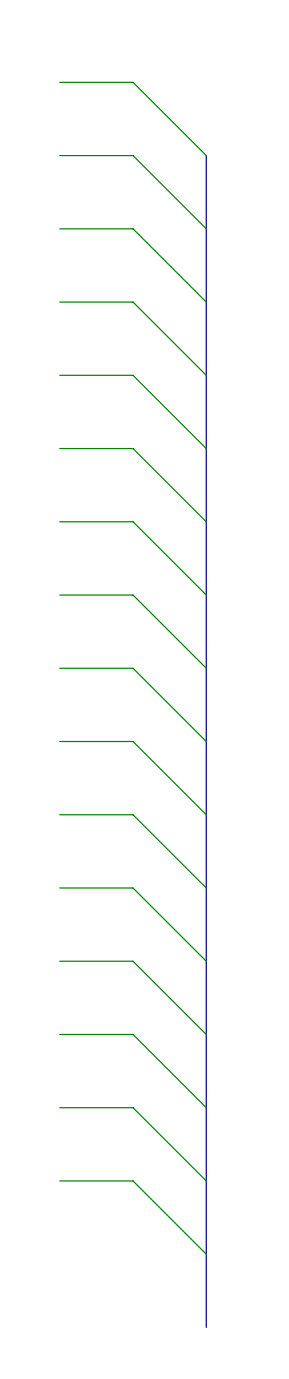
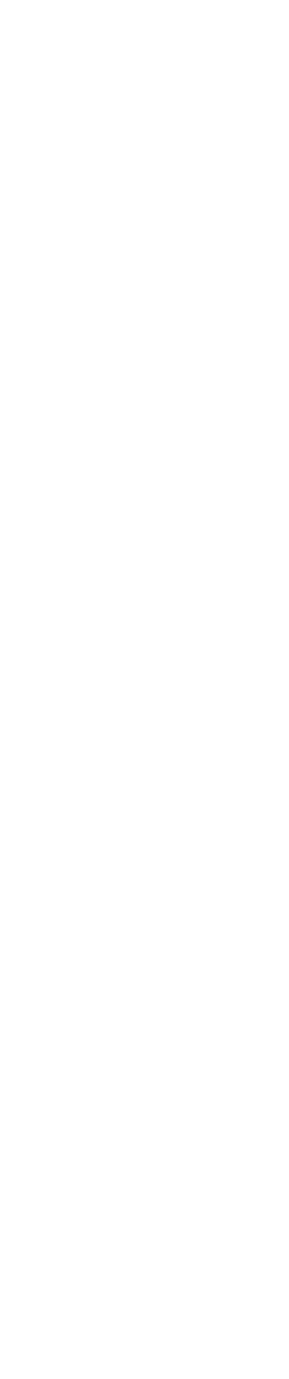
wire: (59, 82) (133, 82) (206, 155) -> none
wire: (59, 155) (133, 155) (206, 228) -> none
bus: (206, 155) (206, 1327) -> none
wire: (59, 228) (133, 228) (206, 302) -> none
wire: (59, 302) (133, 302) (206, 375) -> none
wire: (59, 375) (133, 375) (206, 448) -> none
wire: (59, 448) (133, 448) (206, 521) -> none
wire: (59, 521) (133, 521) (206, 595) -> none
wire: (59, 595) (133, 595) (206, 668) -> none
wire: (59, 668) (133, 668) (206, 741) -> none
wire: (59, 741) (133, 741) (206, 814) -> none
wire: (59, 814) (133, 814) (206, 887) -> none
wire: (59, 887) (133, 887) (206, 961) -> none
wire: (59, 961) (133, 961) (206, 1034) -> none
wire: (59, 1034) (133, 1034) (206, 1107) -> none
wire: (59, 1107) (133, 1107) (206, 1180) -> none
wire: (59, 1180) (133, 1180) (206, 1254) -> none

